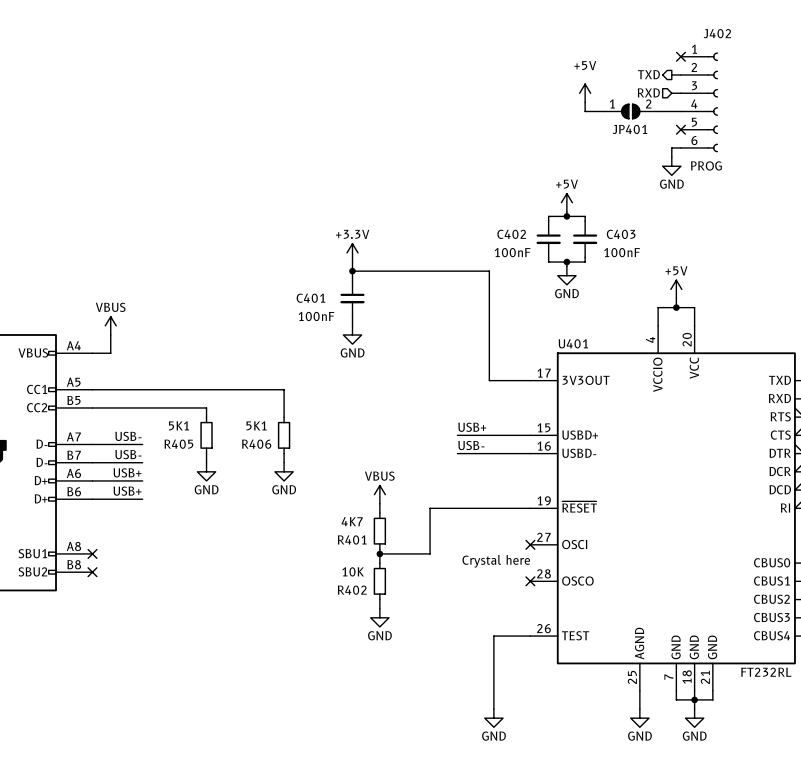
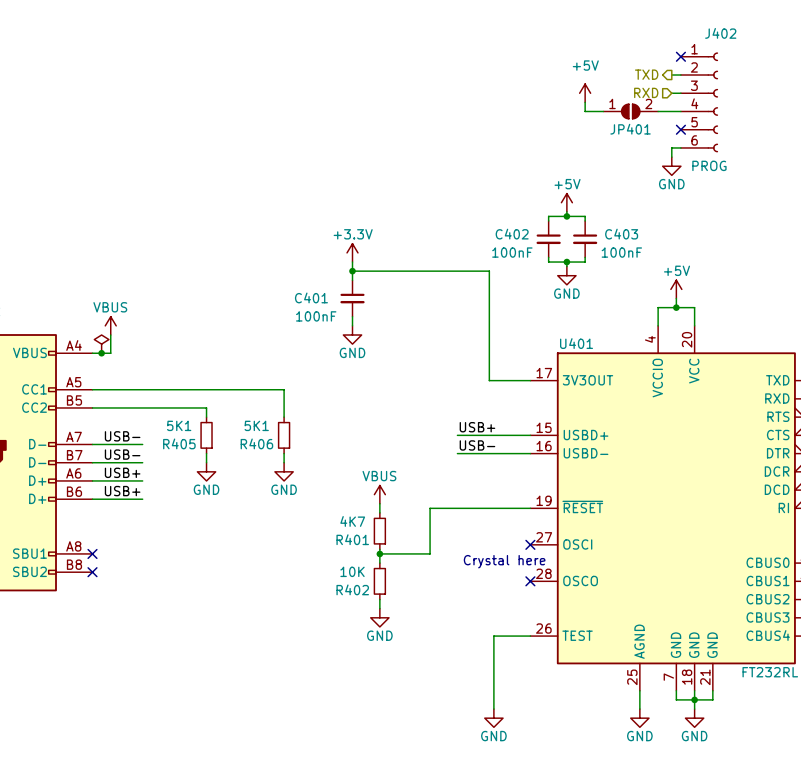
power symbol: none -> (101, 344)
junction: none -> (101, 353)

